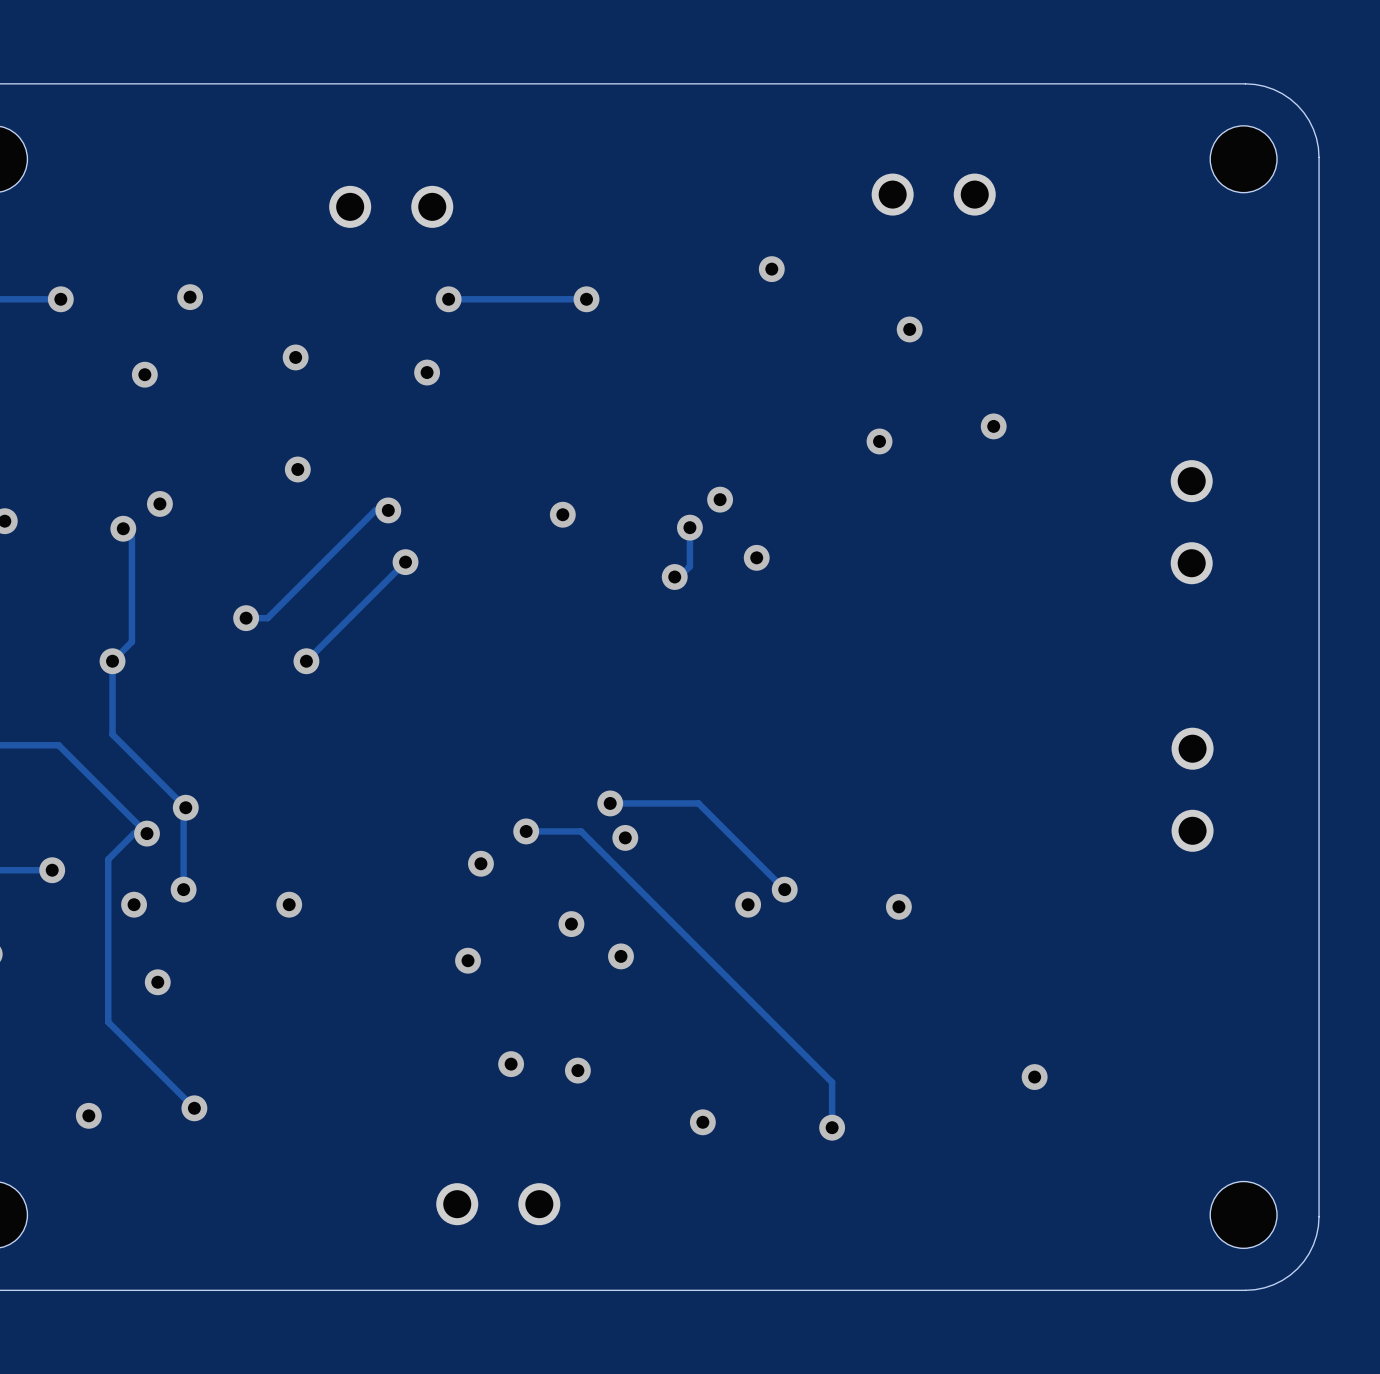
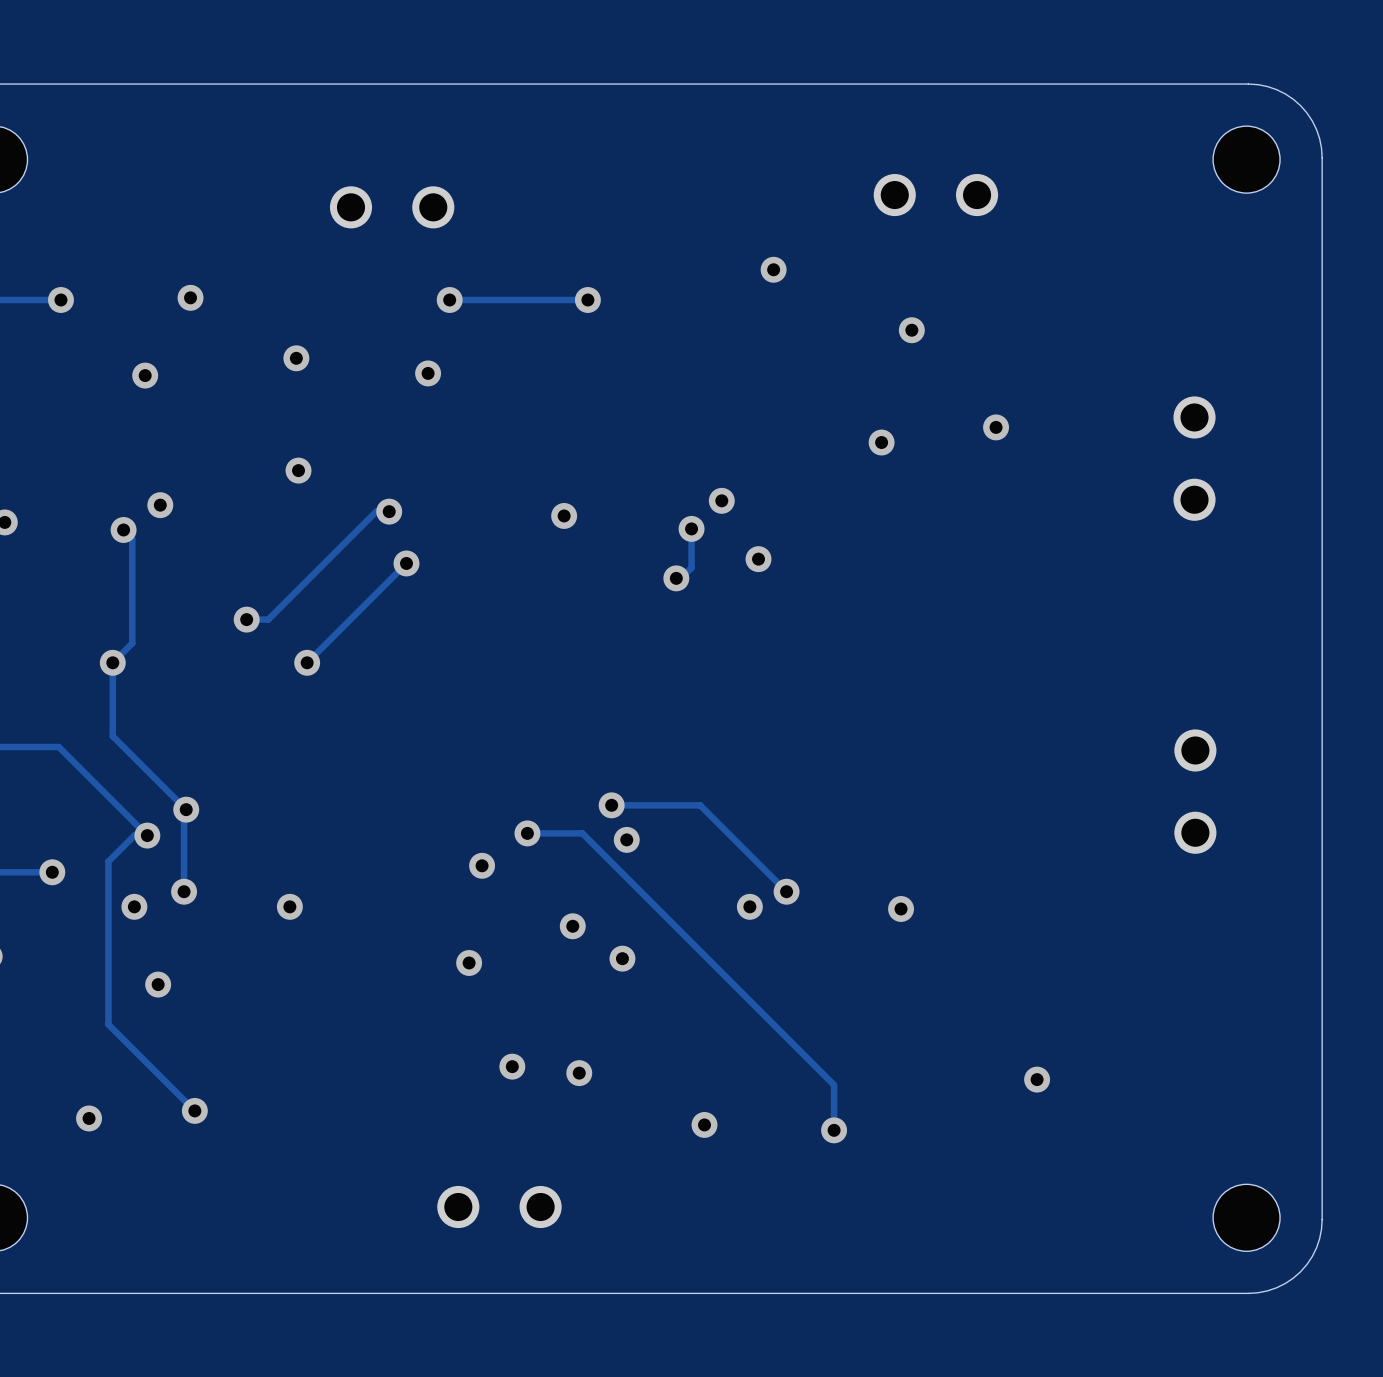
part position: (1191, 522) -> (1194, 458)

